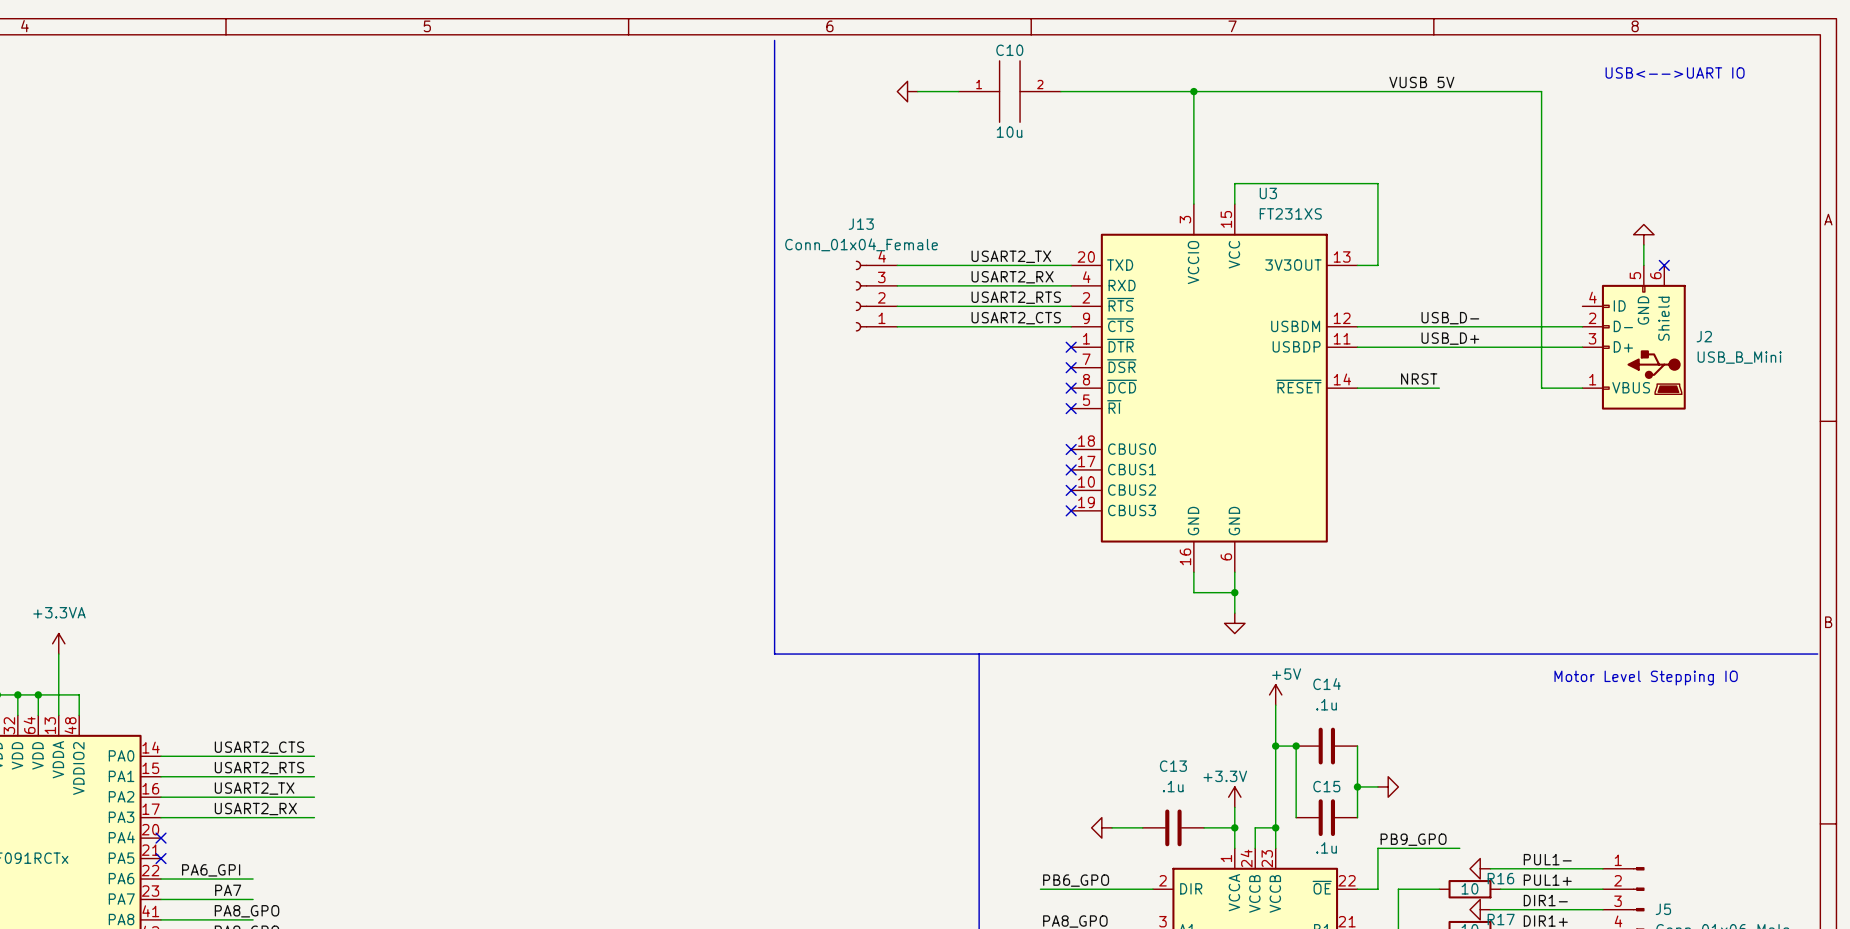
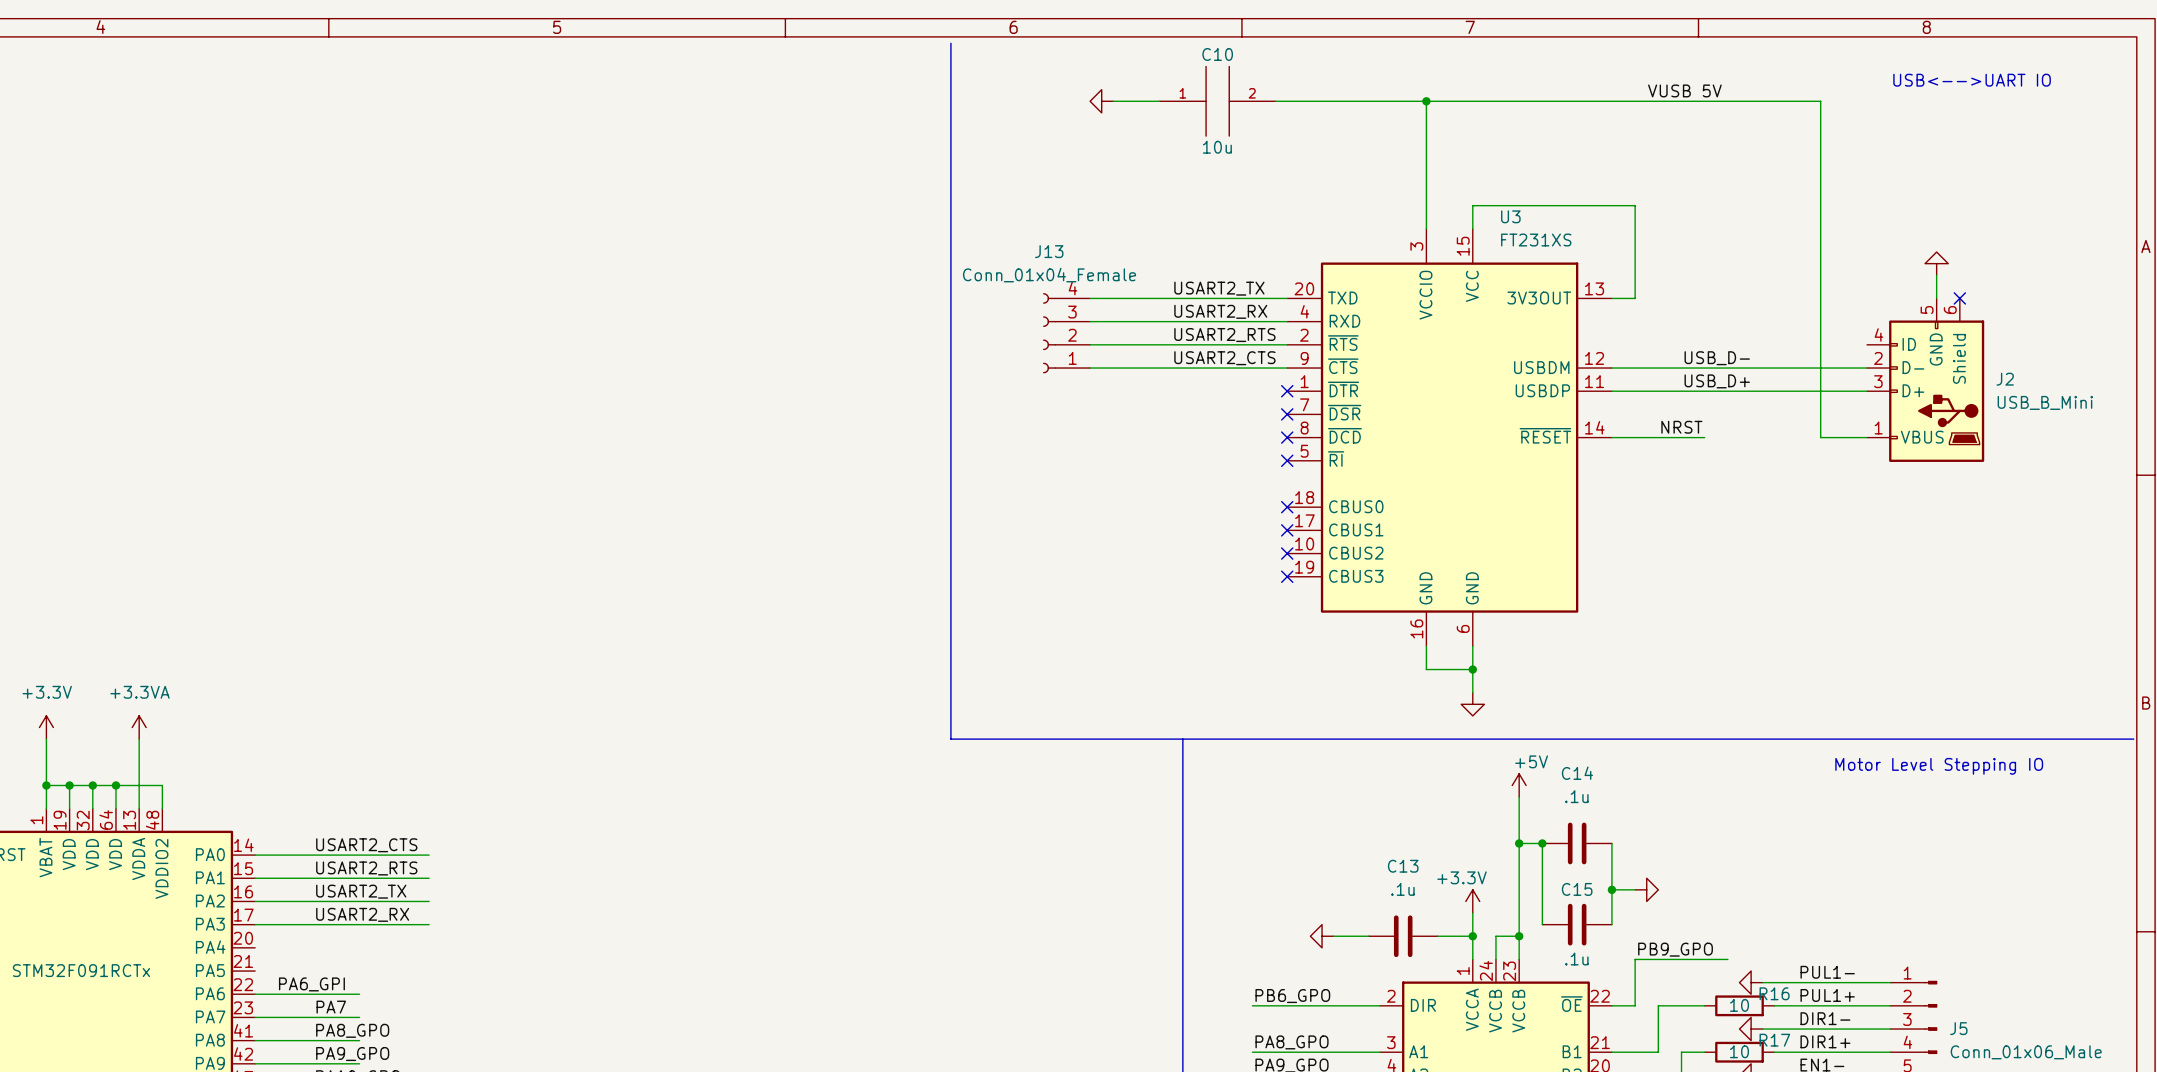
no-connect mark: (161, 838) -> none
no-connect mark: (161, 858) -> none

